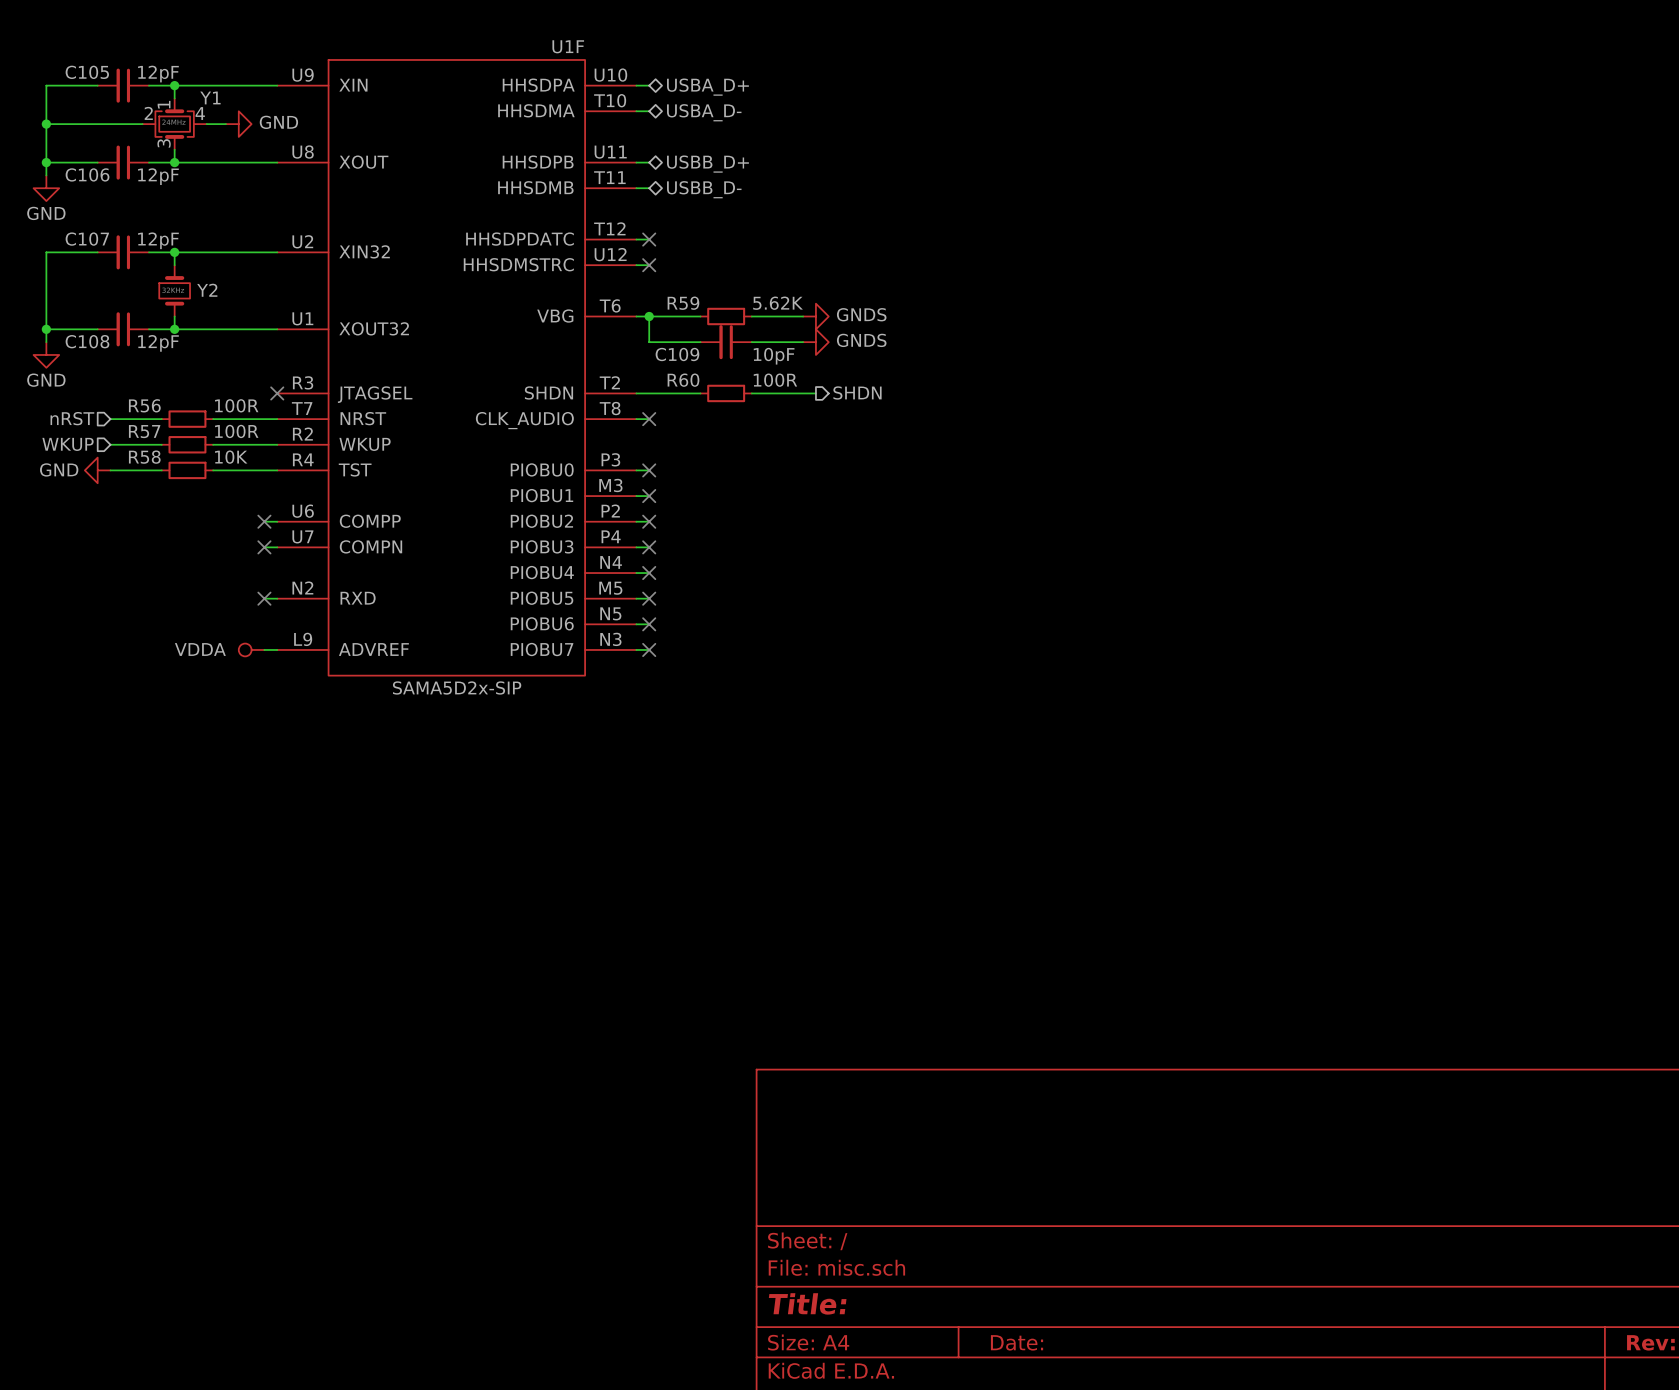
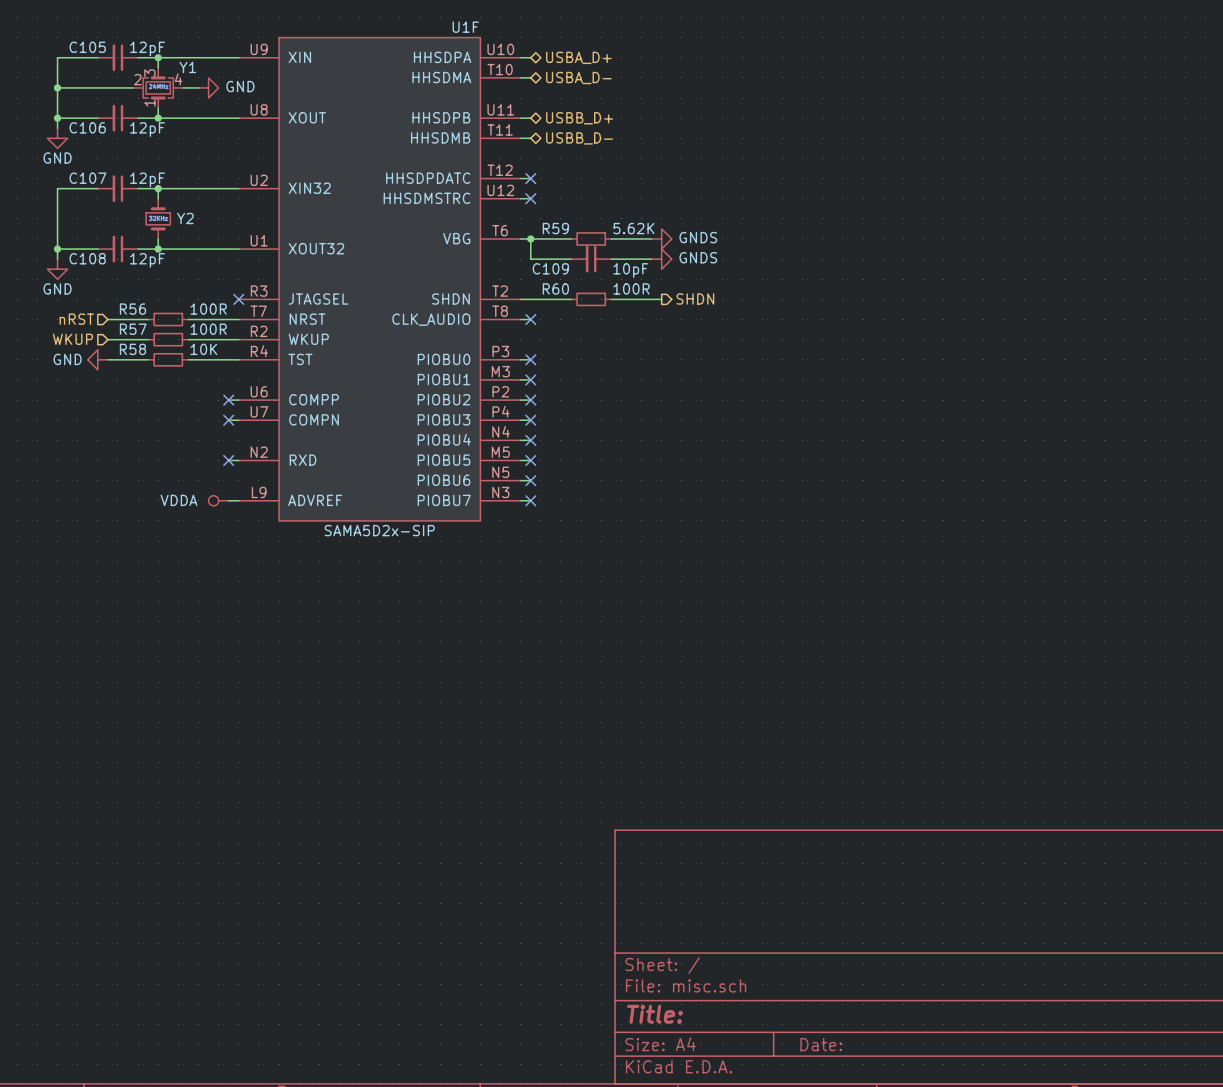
Y1 flip: as is (174, 124) -> up-down (158, 87)

